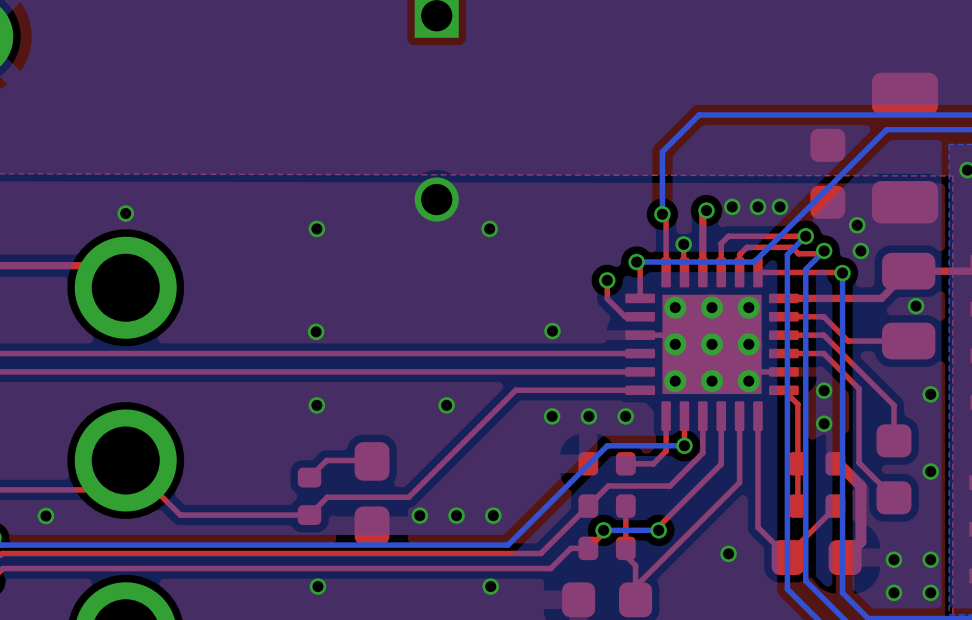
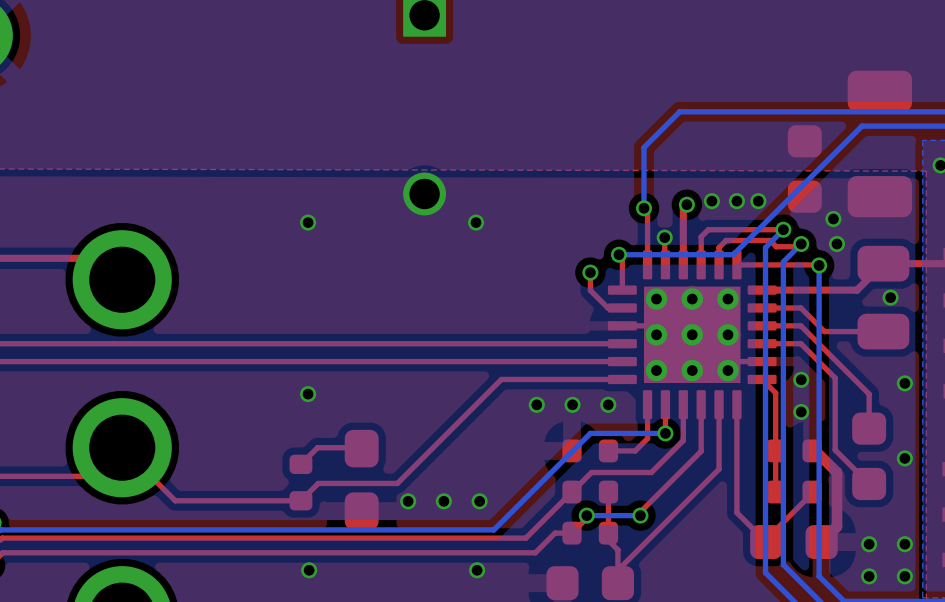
via: (125, 213) -> none
via: (316, 331) -> none
via: (552, 331) -> none
via: (446, 405) -> none
via: (45, 516) -> none
via: (728, 553) -> none

